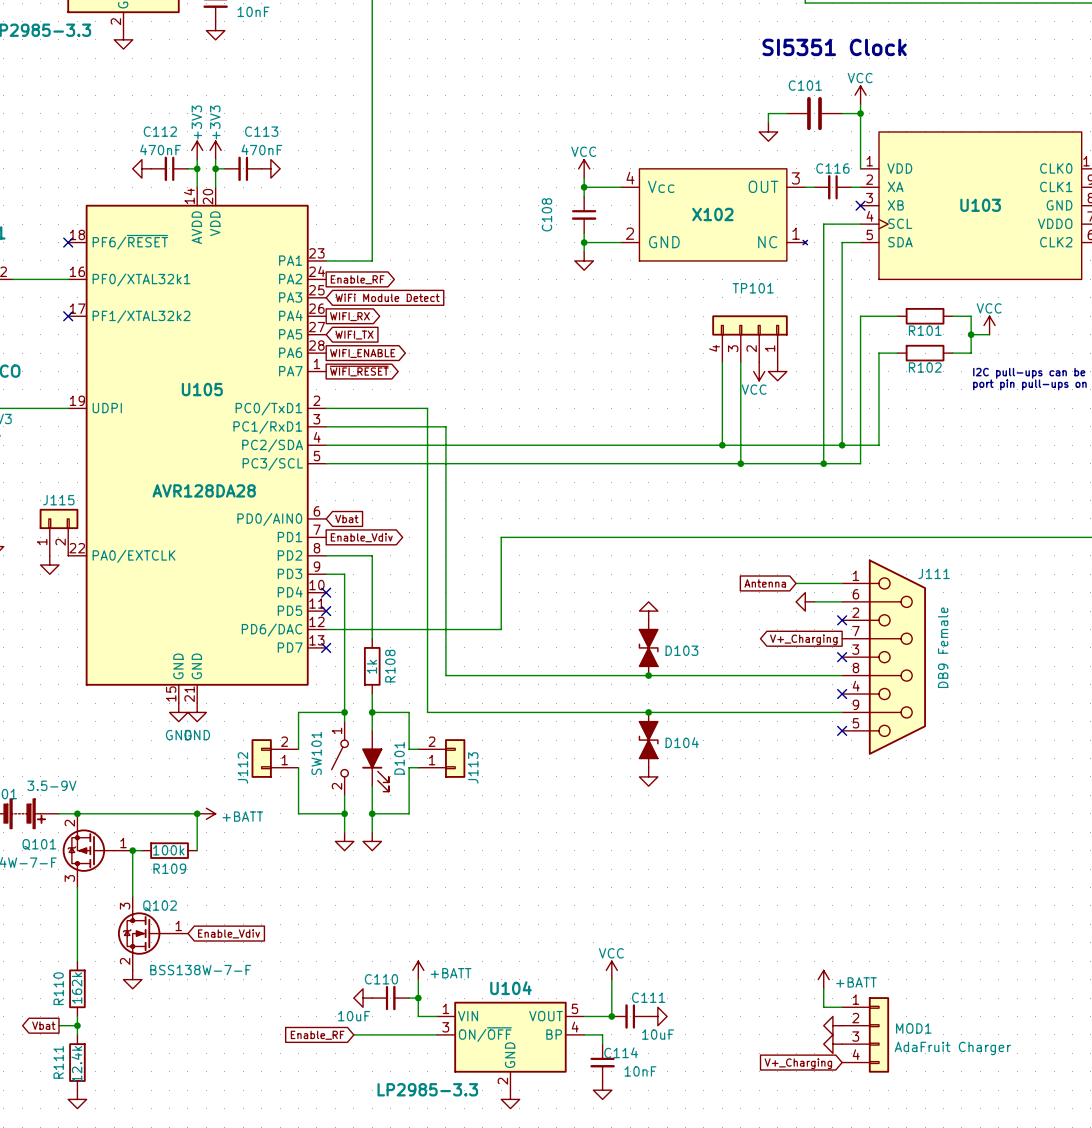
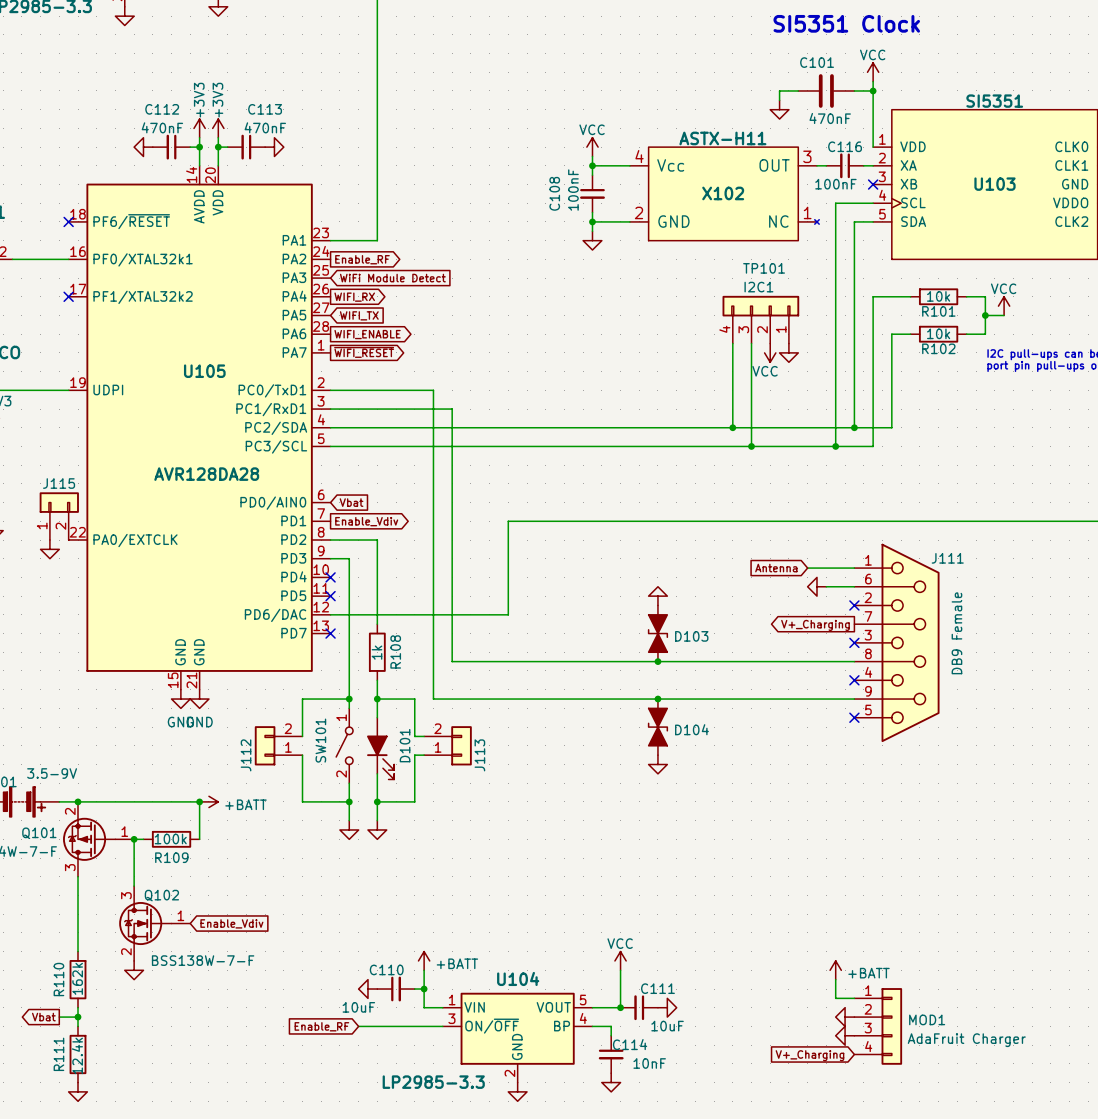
U103 value: none -> SI5351 (994, 101)
C101 value: none -> 470nF (830, 118)
X102 value: none -> ASTX-H11 (722, 138)
C116 value: none -> 100nF (835, 184)
C108 value: none -> 100nF (573, 190)
TP101 value: none -> I2C1 (758, 287)
R101 value: none -> 10k (938, 296)
R102 value: none -> 10k (938, 333)

